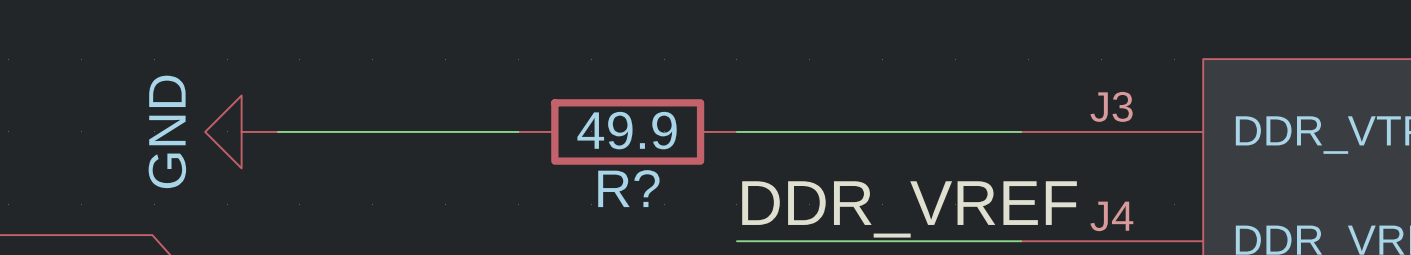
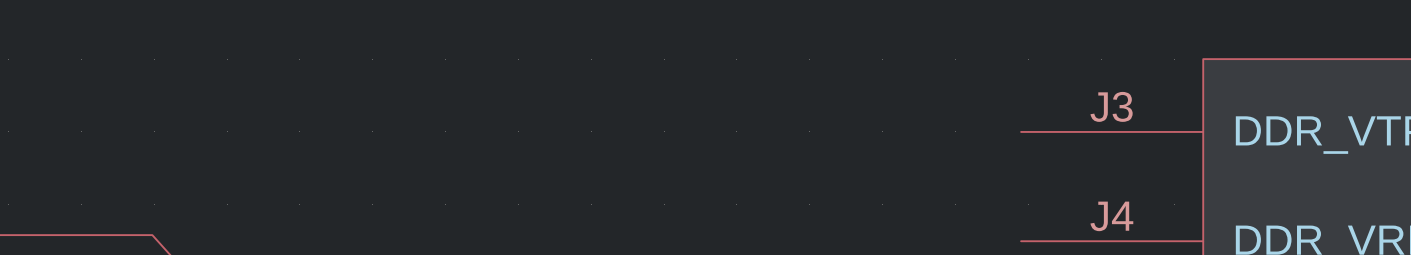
power symbol: GND (241, 131) -> none
wire: (278, 131) (518, 131) -> none
R?: 49.9 (627, 131) -> none
wire: (736, 131) (1021, 131) -> none
label: DDR_VREF (909, 209) -> none
wire: (736, 241) (1021, 241) -> none

